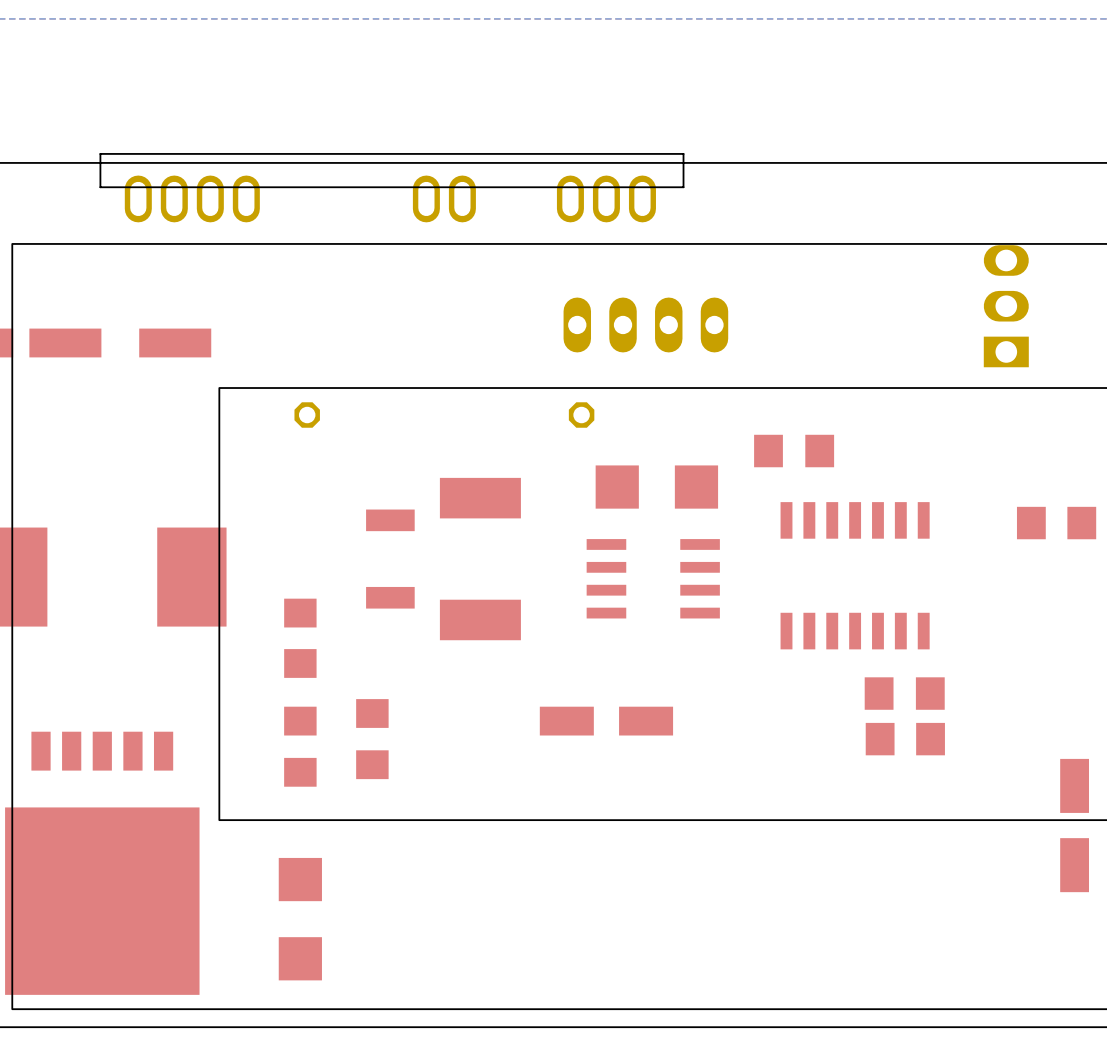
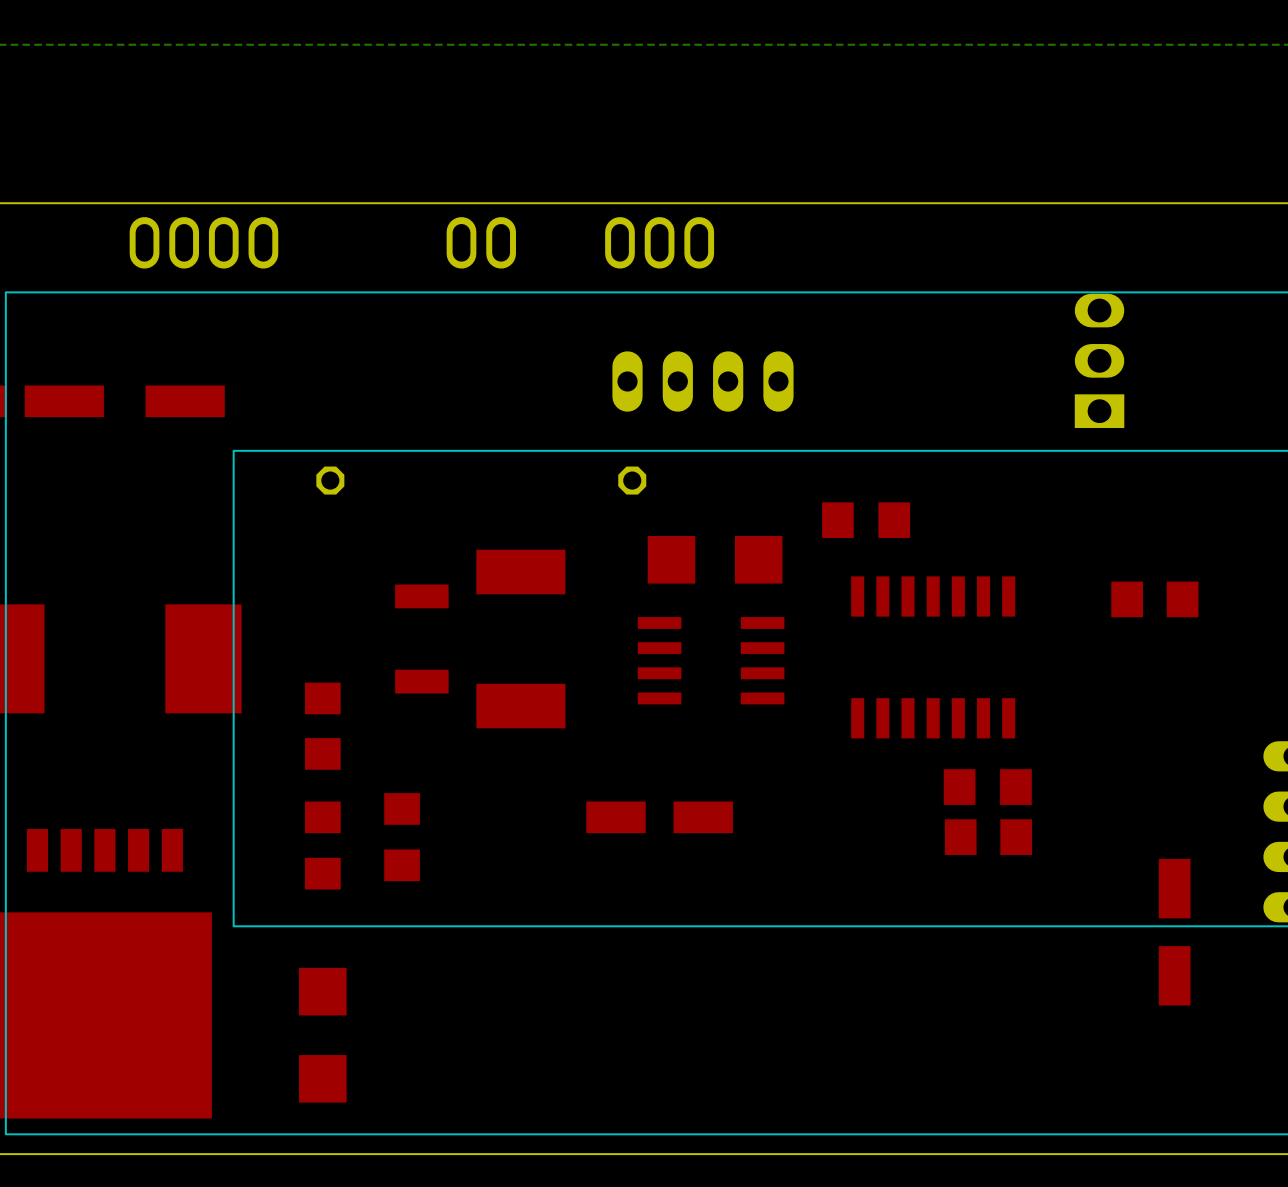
board edge: (683, 153) (100, 153) (100, 187) (683, 187) (683, 153) -> none

